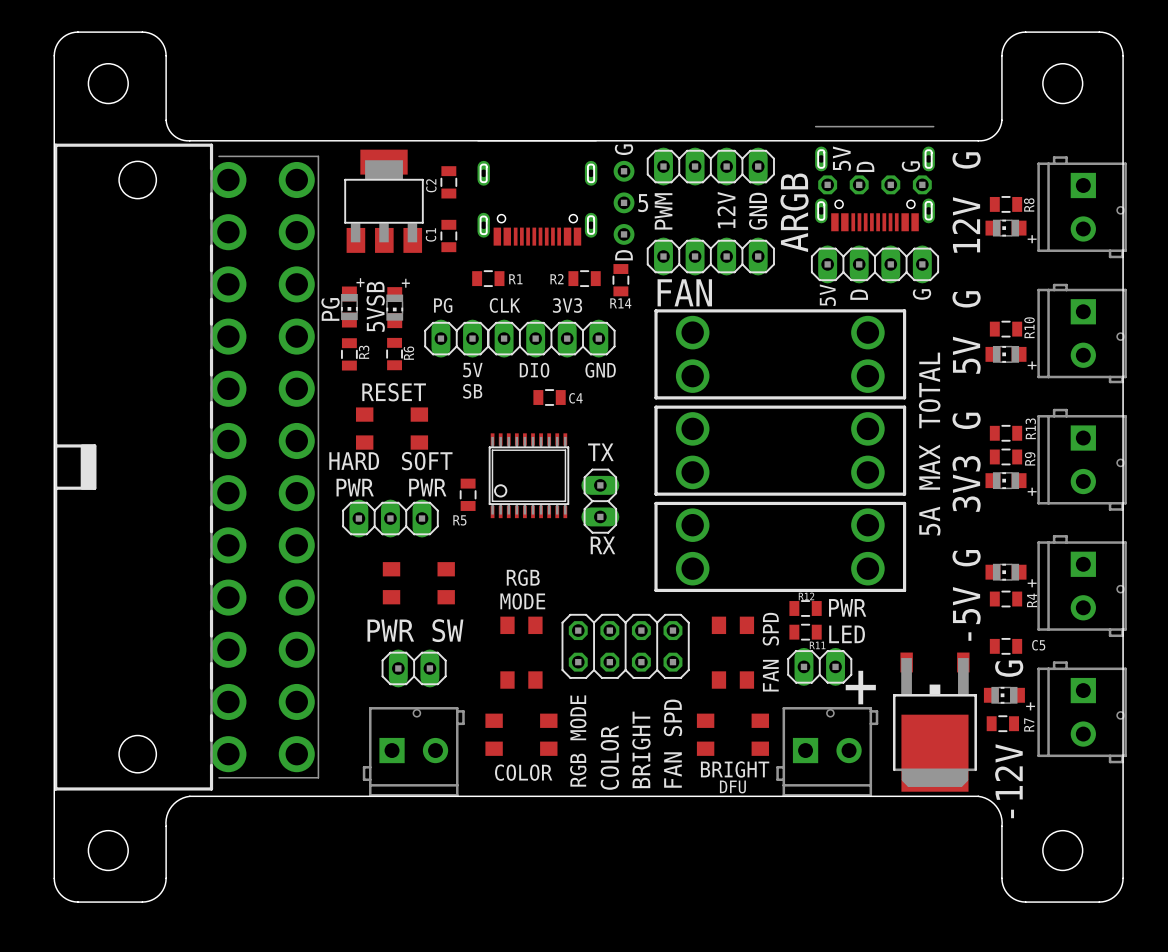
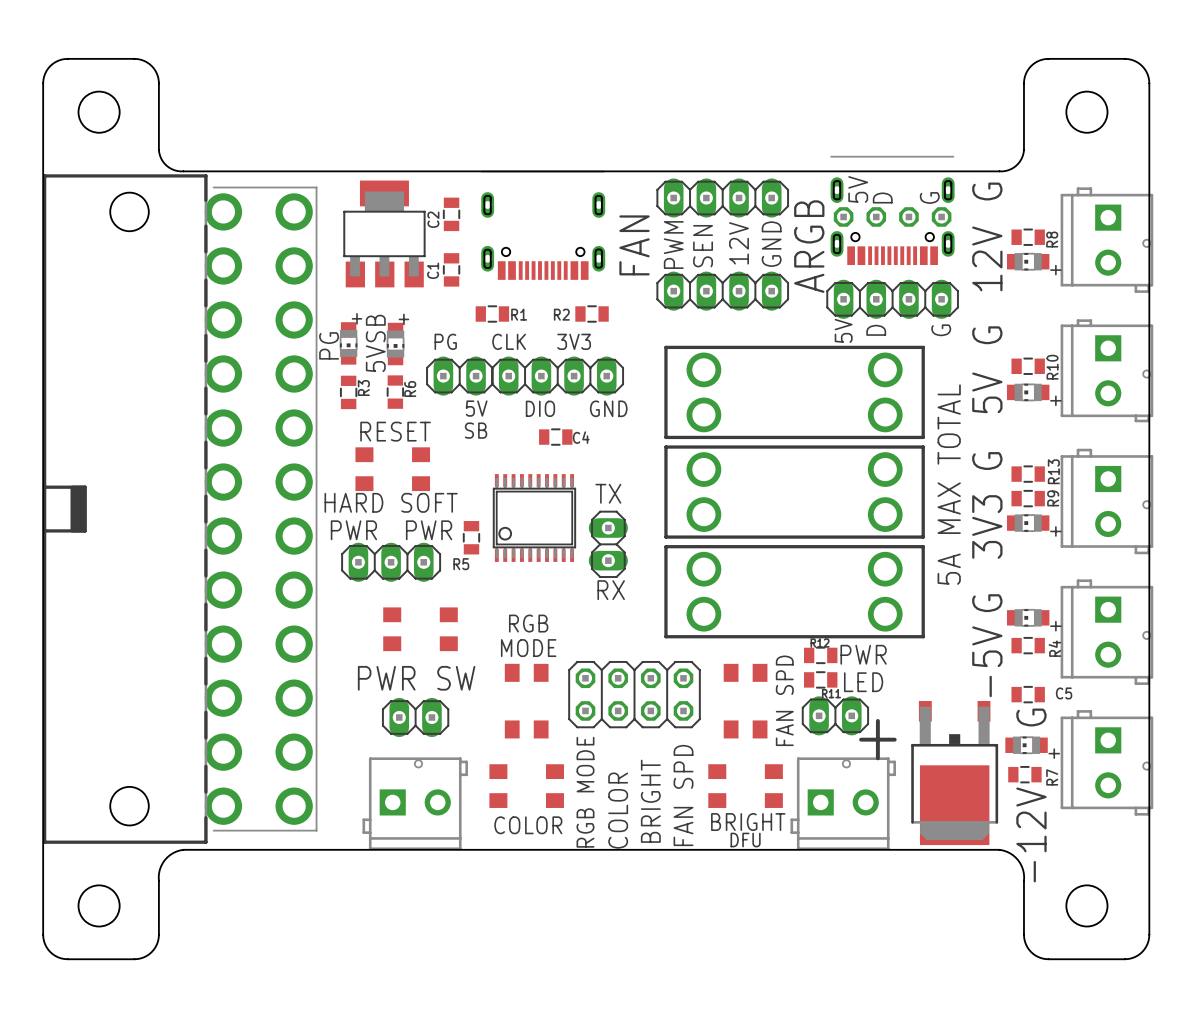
text: G (624, 149) -> none
part: (624, 202) -> none
text: 5 (643, 203) -> none
text: none -> SEN (703, 246)
text: D (623, 255) -> none
R14: (620, 280) -> none
text rotation: 0° (684, 292) -> 90° counterclockwise (634, 245)
text position: FAN (684, 292) -> FAN (634, 245)

